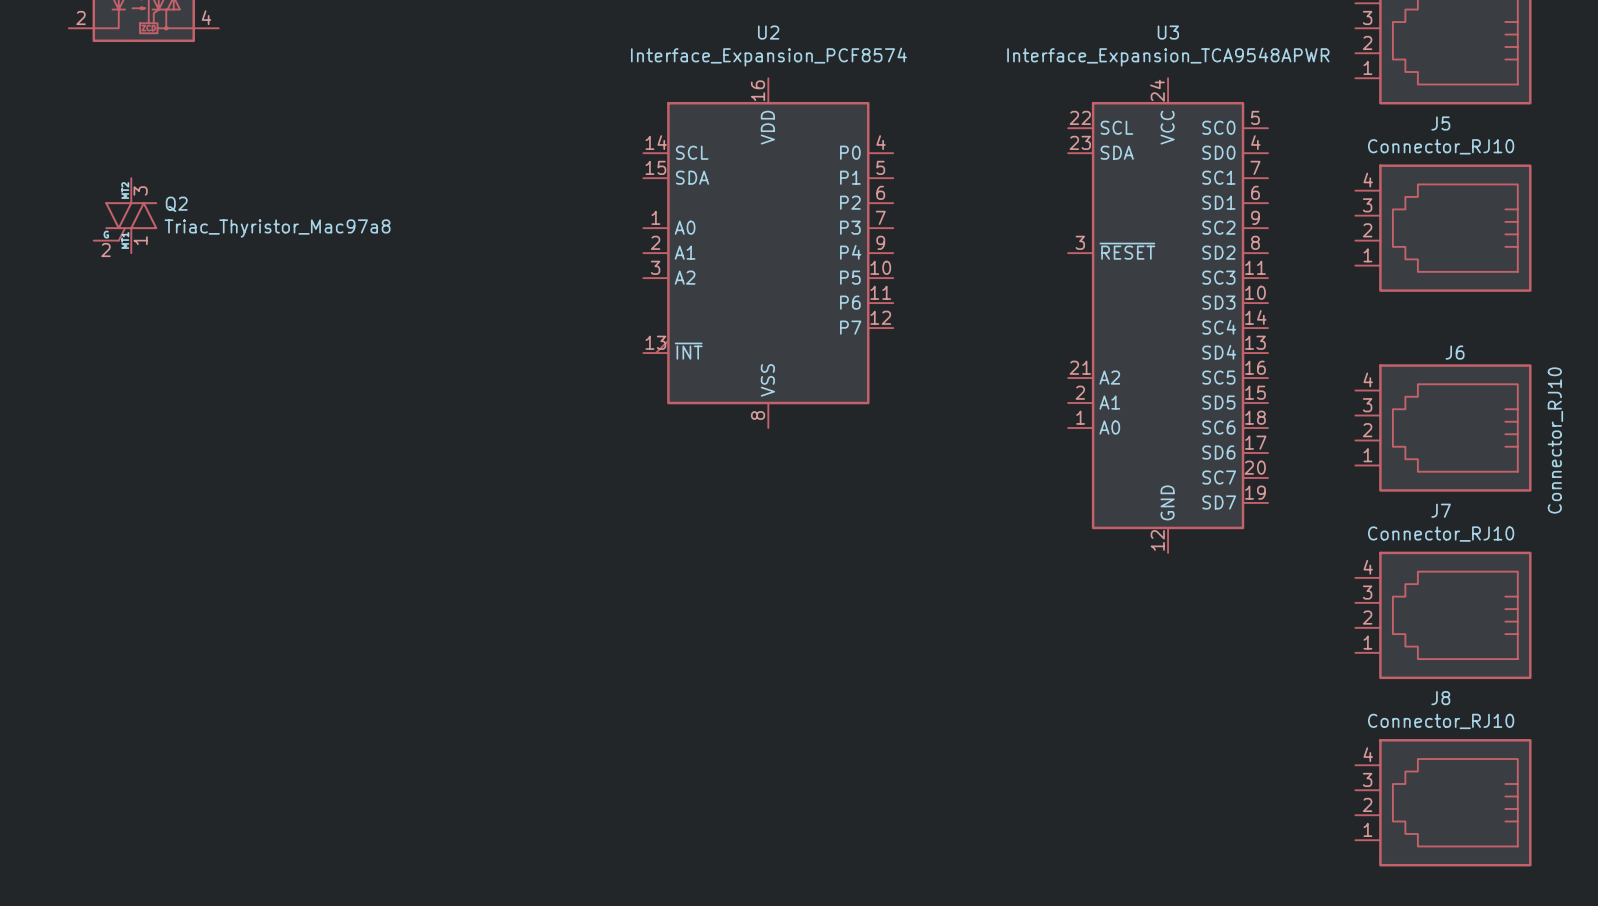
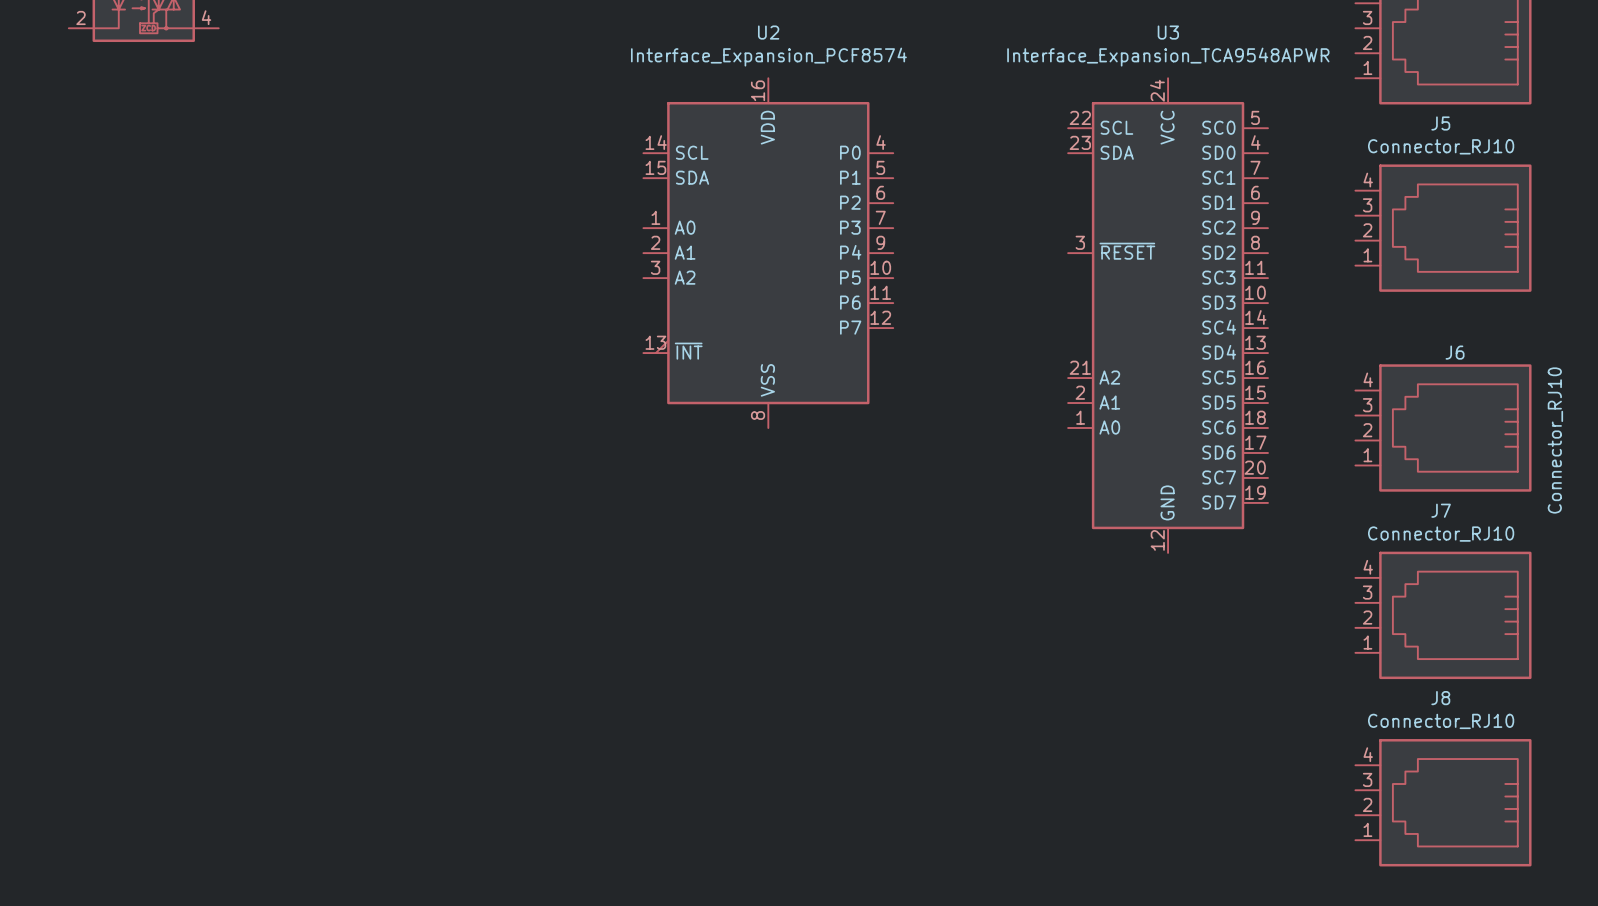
Q2: Triac_Thyristor_Mac97a8 (125, 215) -> none

